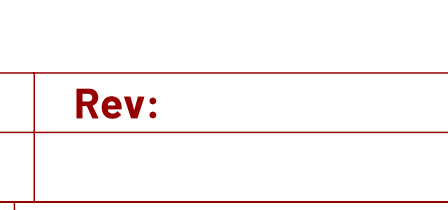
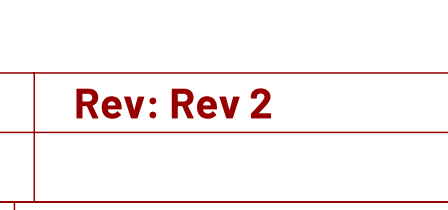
title block: Rev: (116, 103) -> Rev: Rev 2 (173, 103)

